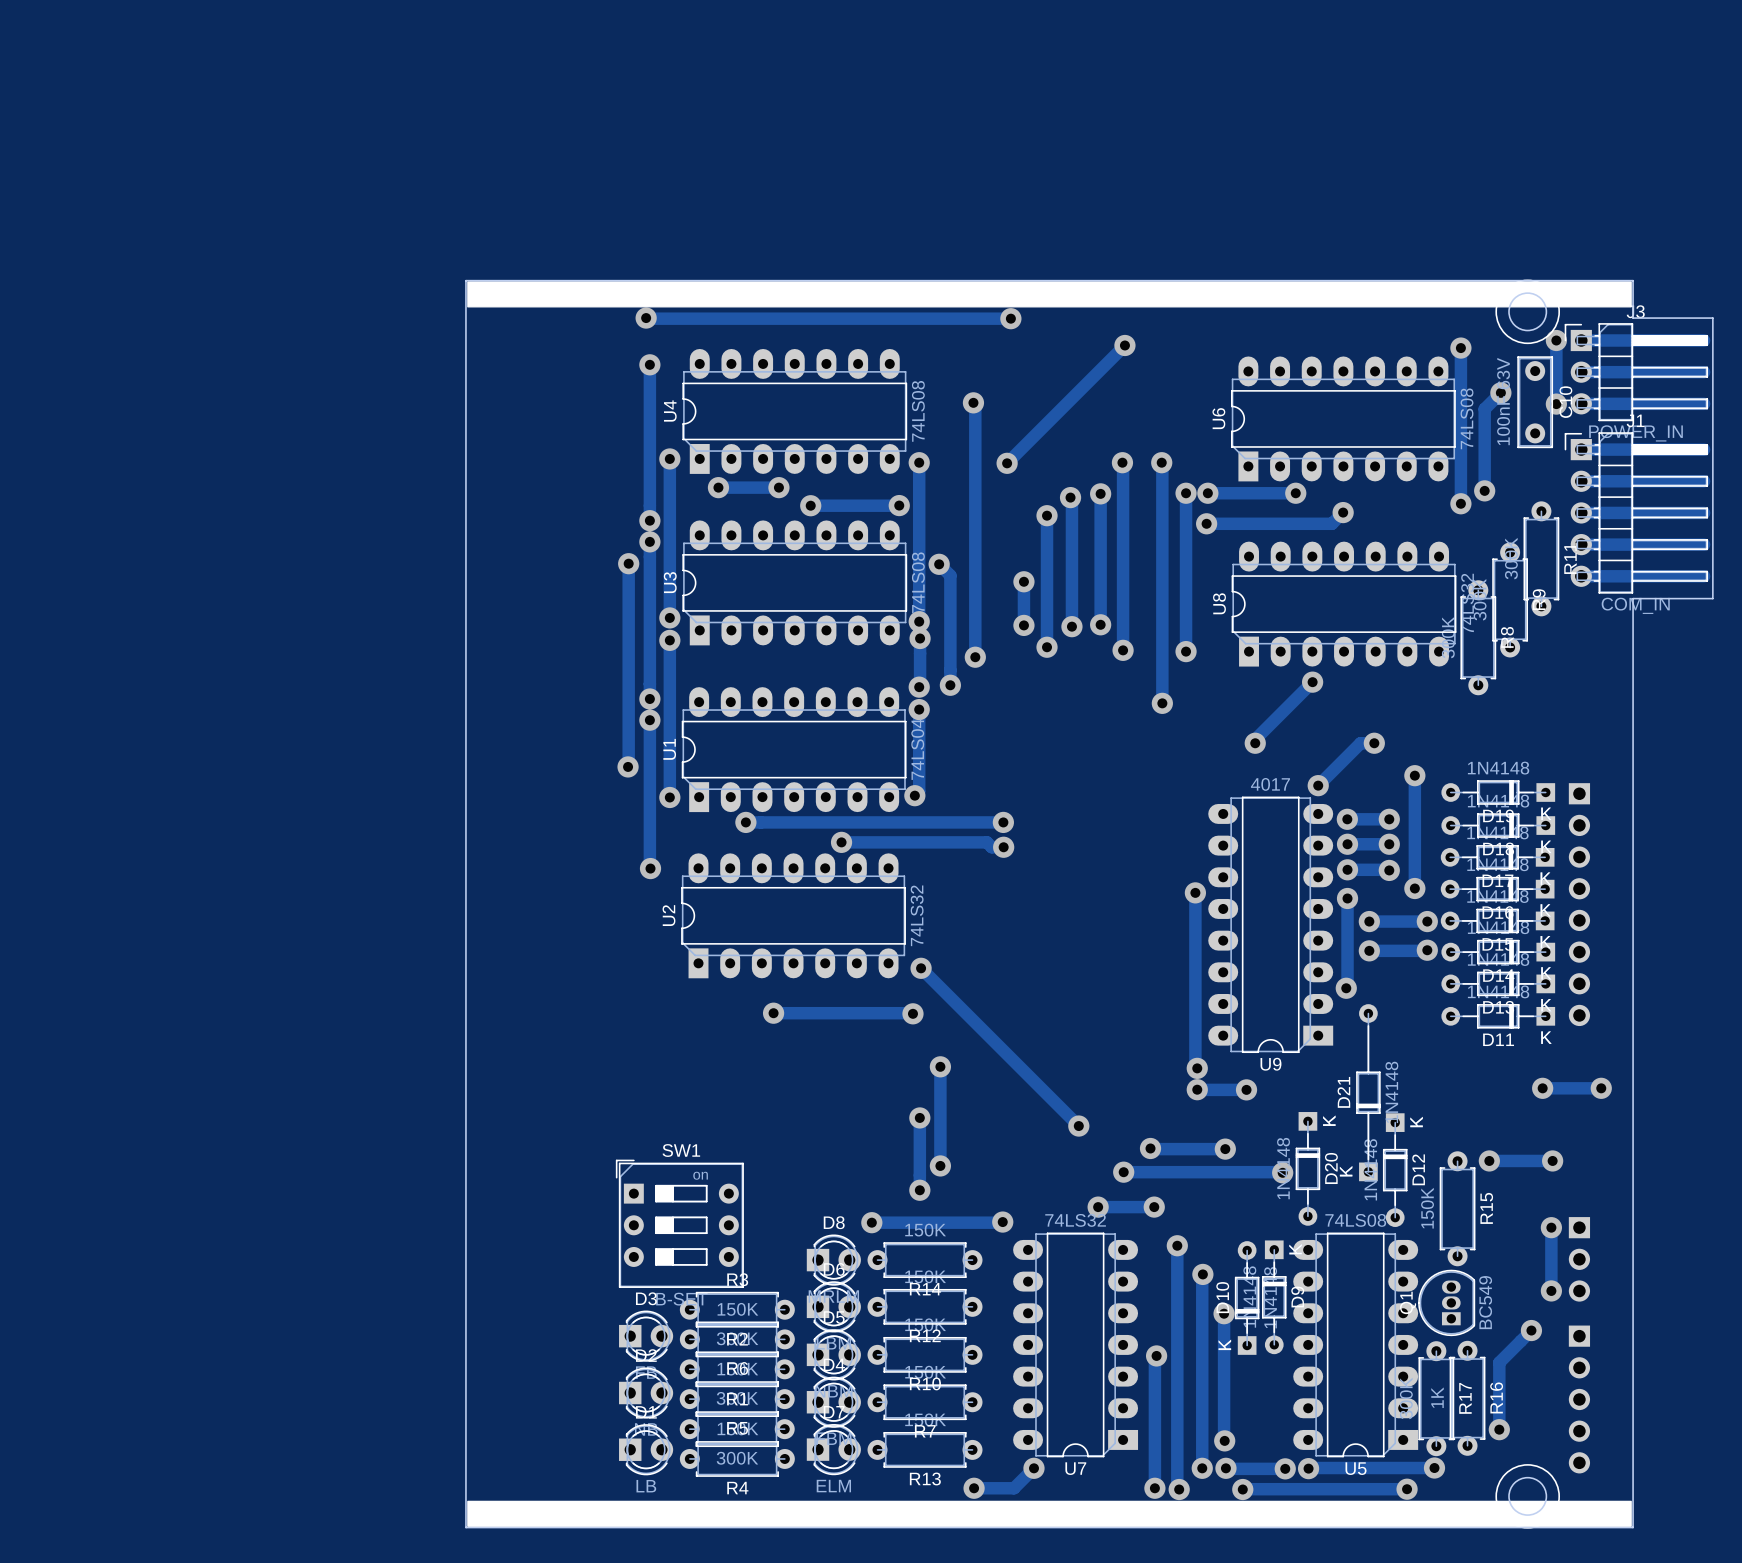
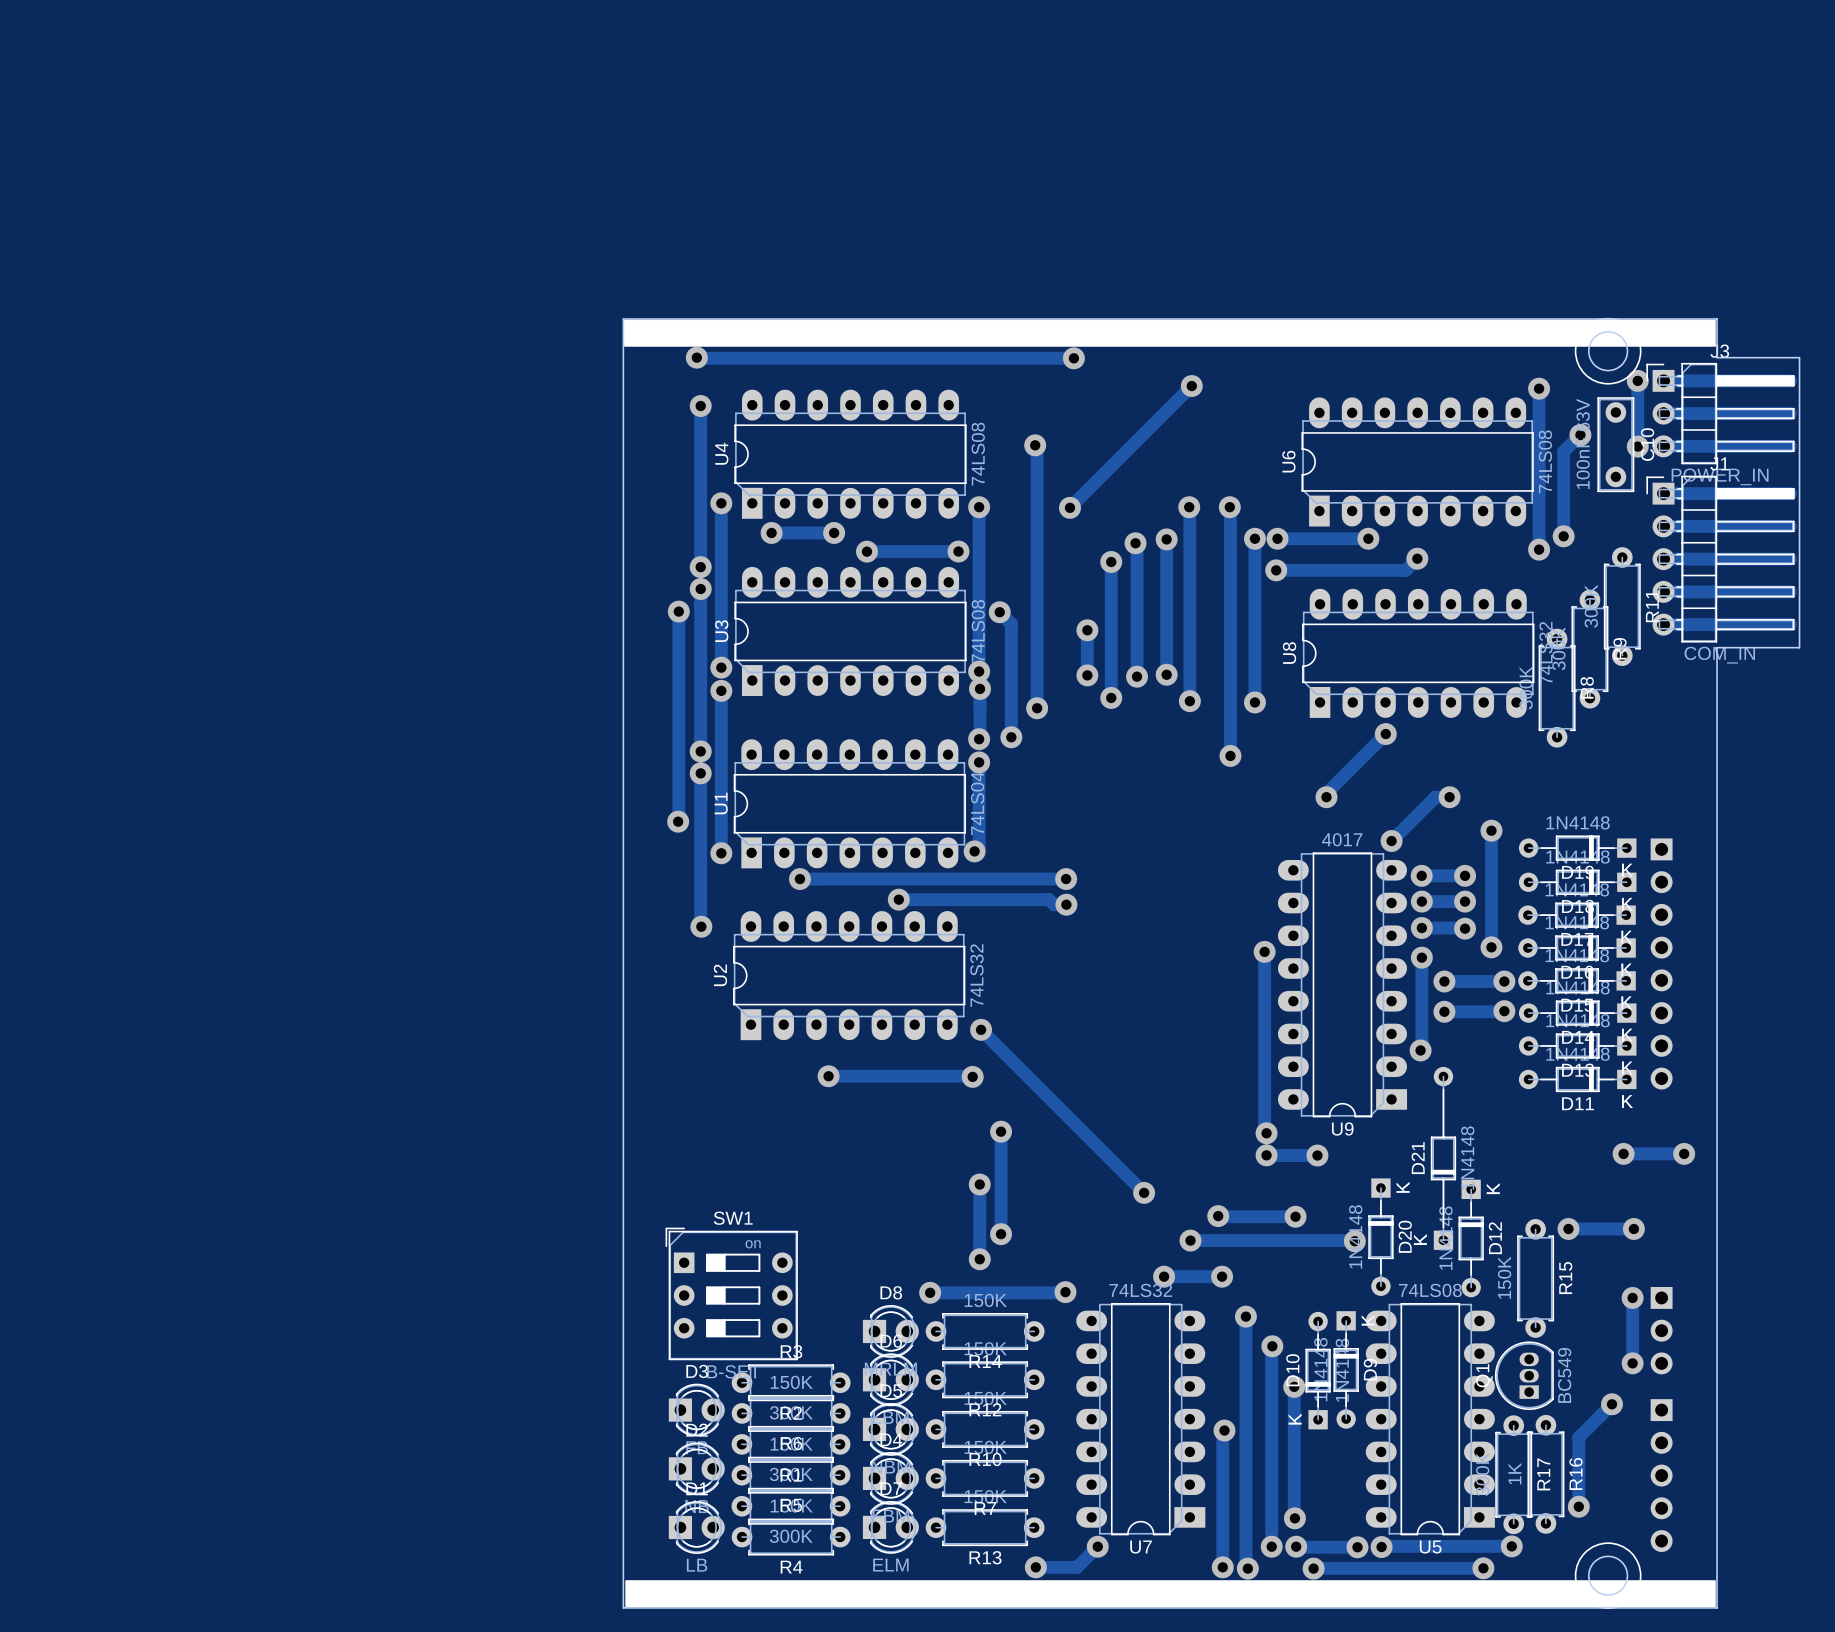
board edge: (575, 280) (465, 280) (465, 1527) (575, 1527) -> (623, 319) (623, 1607)
drawing: [467, 281, 1632, 308] -> none
drawing: none -> [624, 319, 1716, 347]
drawing: [467, 1500, 1632, 1527] -> none
drawing: none -> [625, 1580, 1716, 1608]

